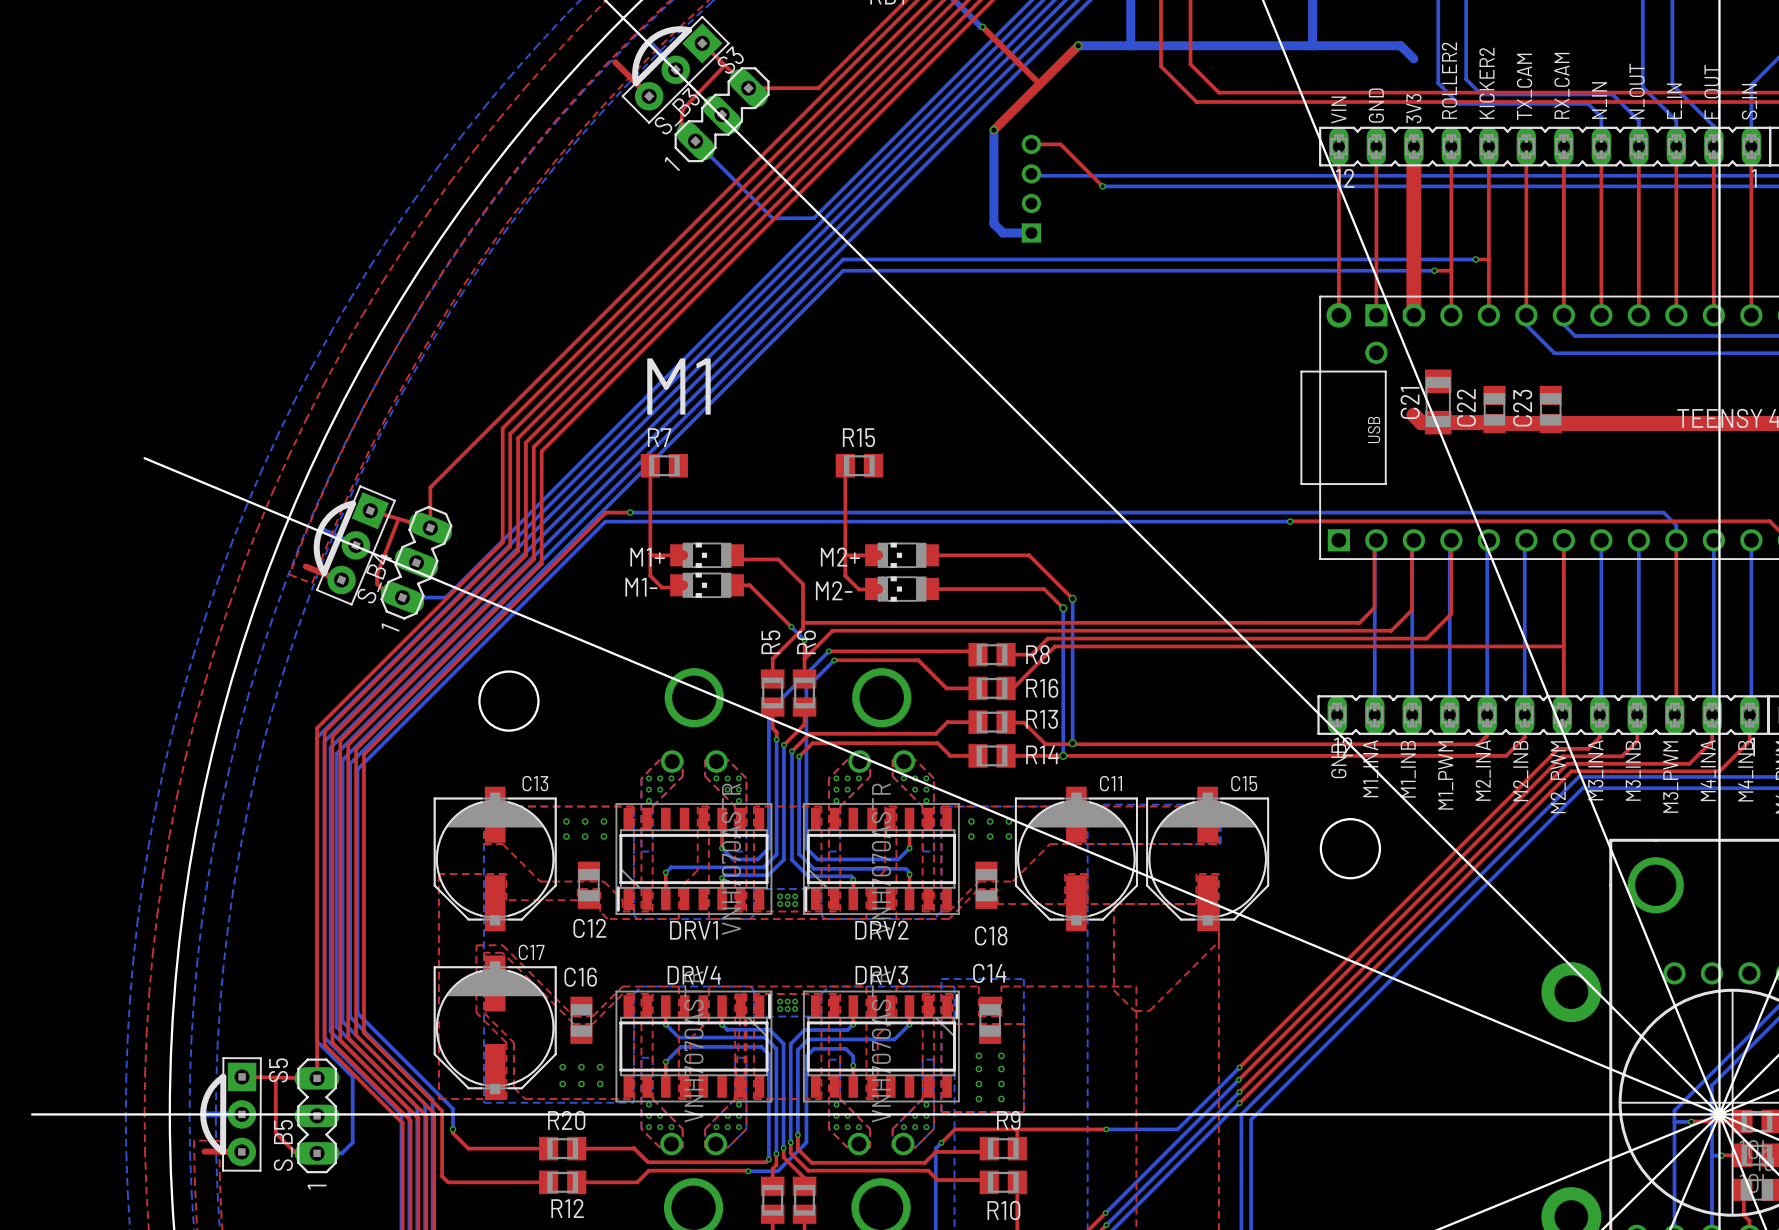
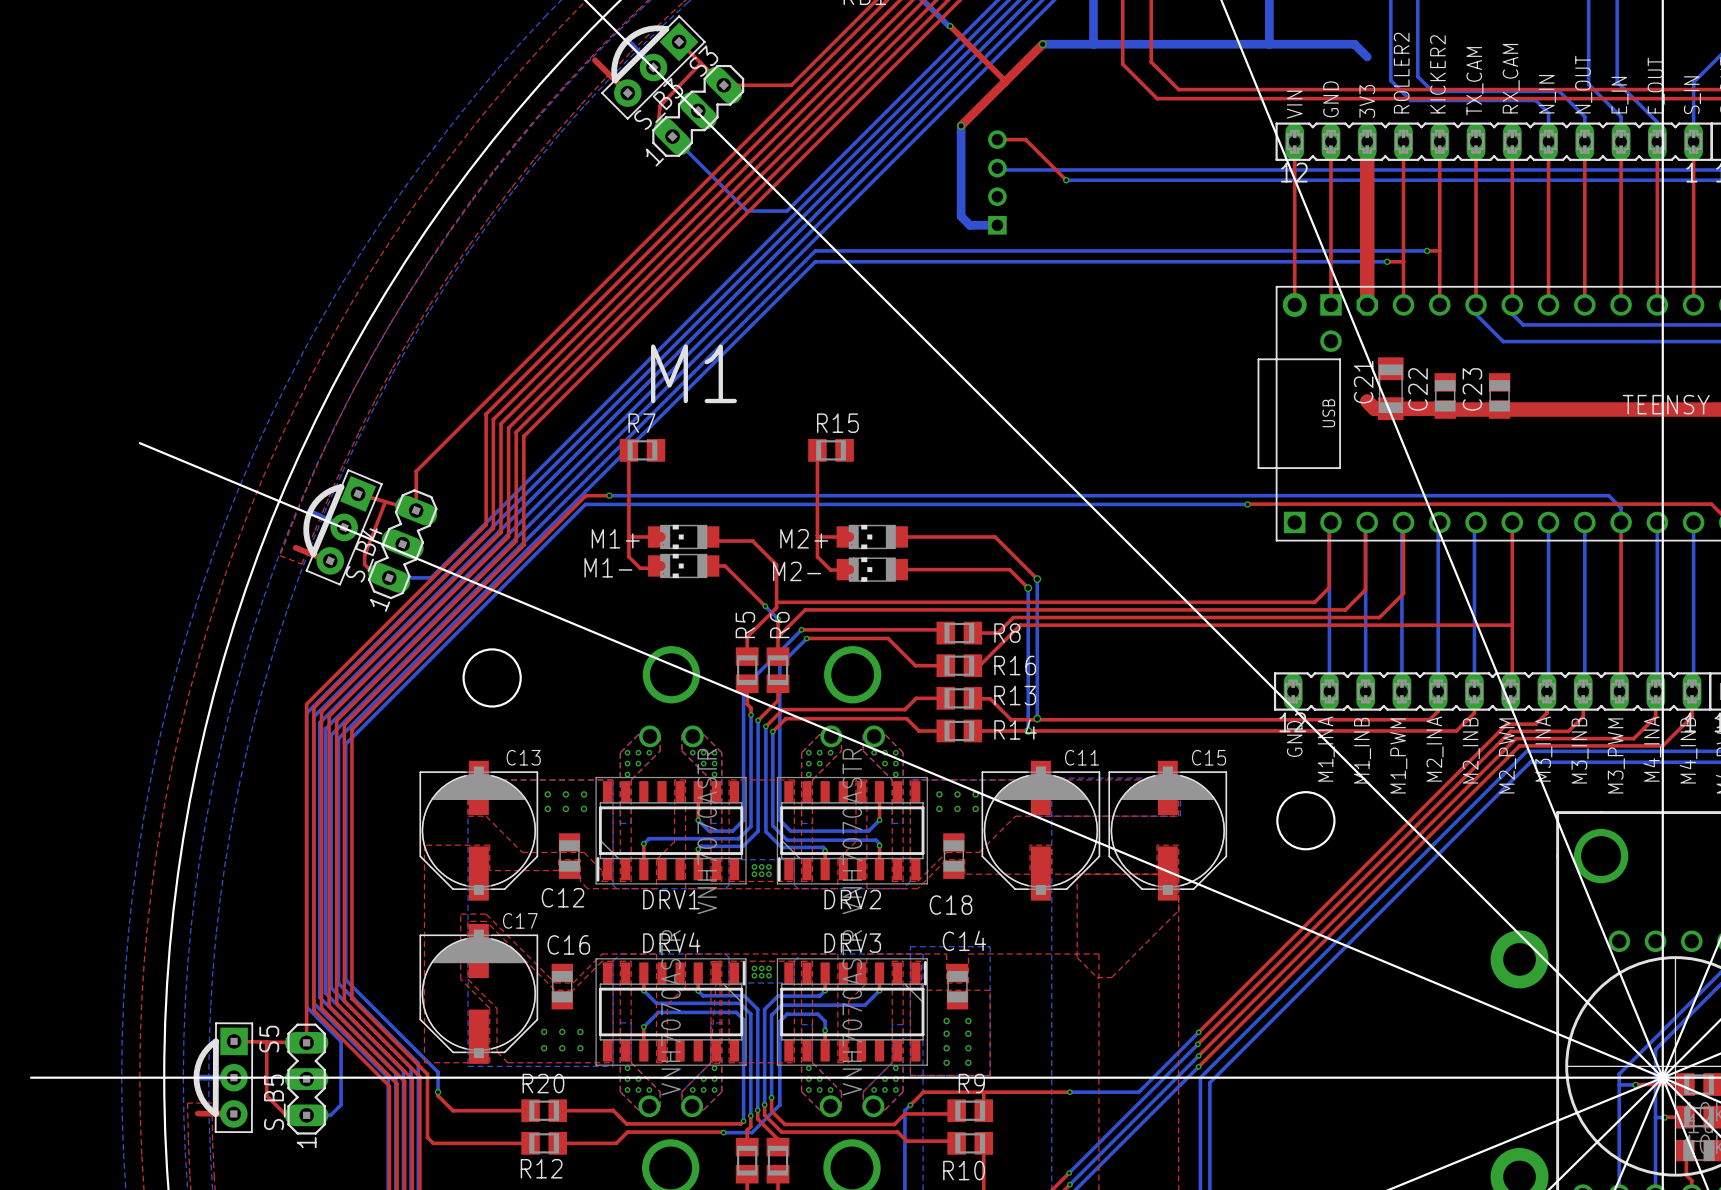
M1 name position: M1 (678, 386) -> M1 (693, 373)

